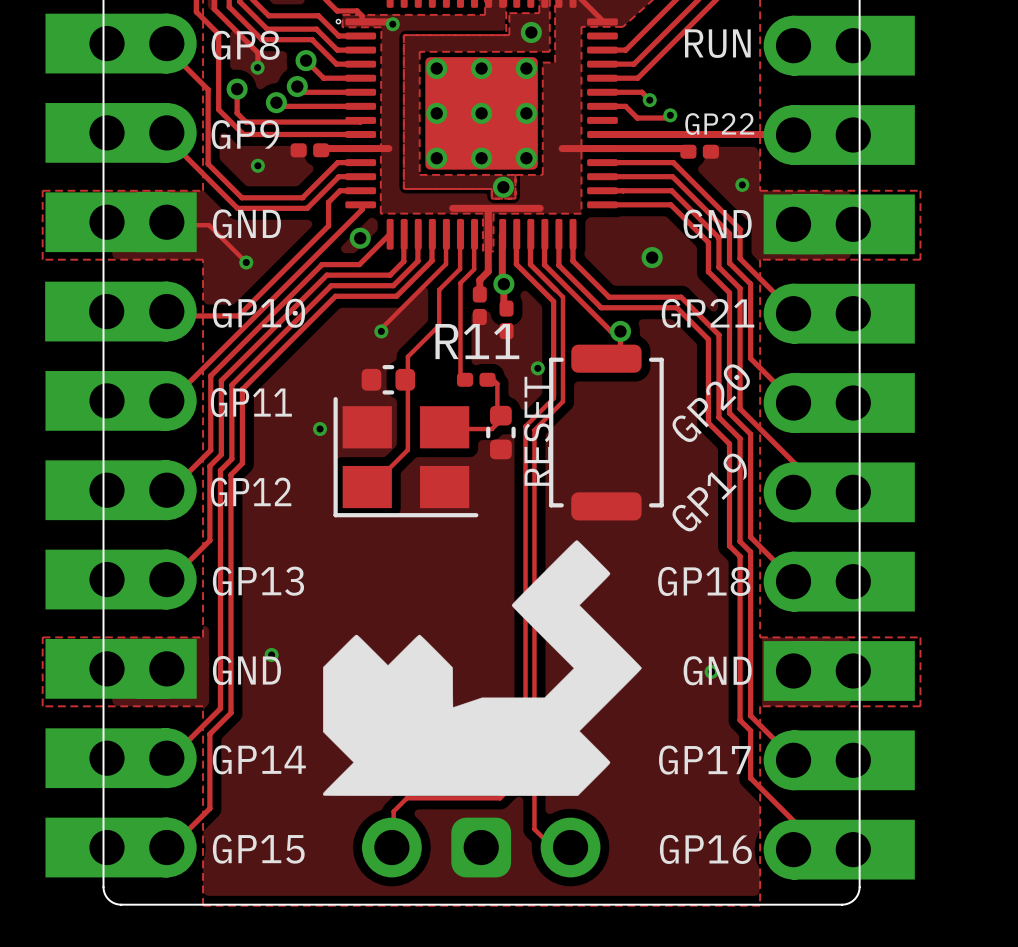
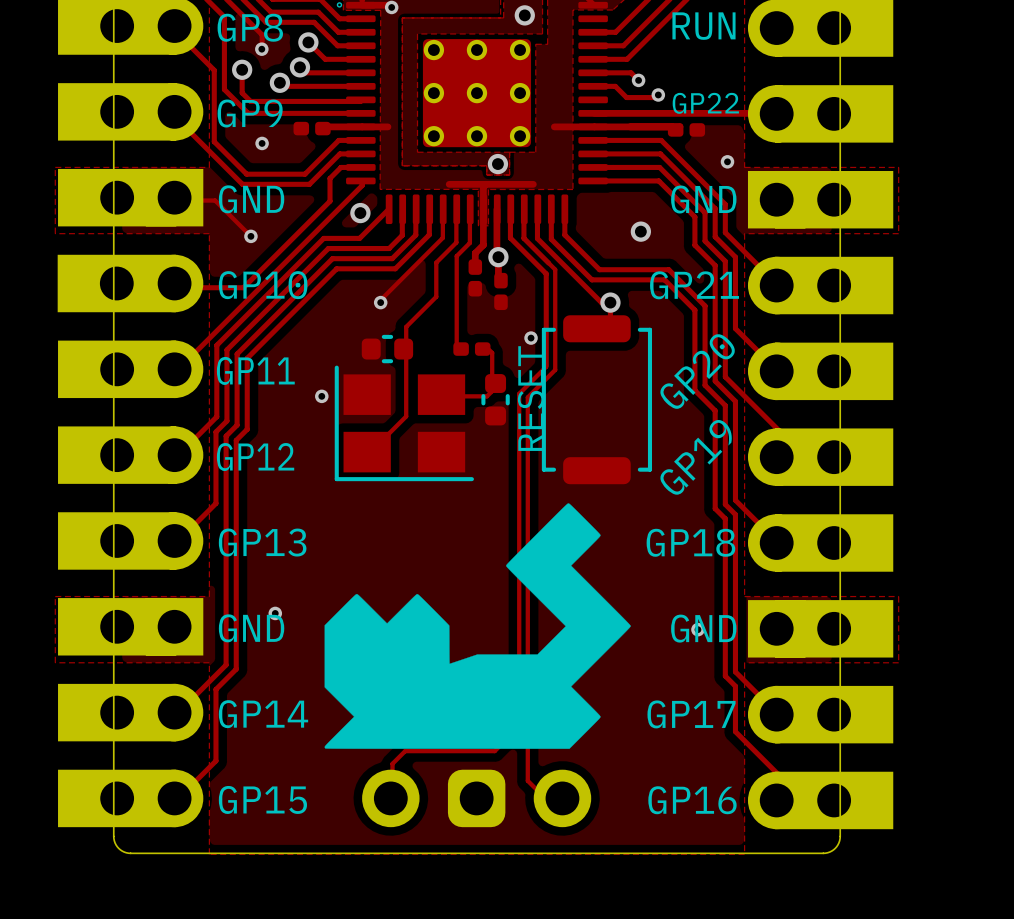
R11 name: R11 (477, 341) -> none

